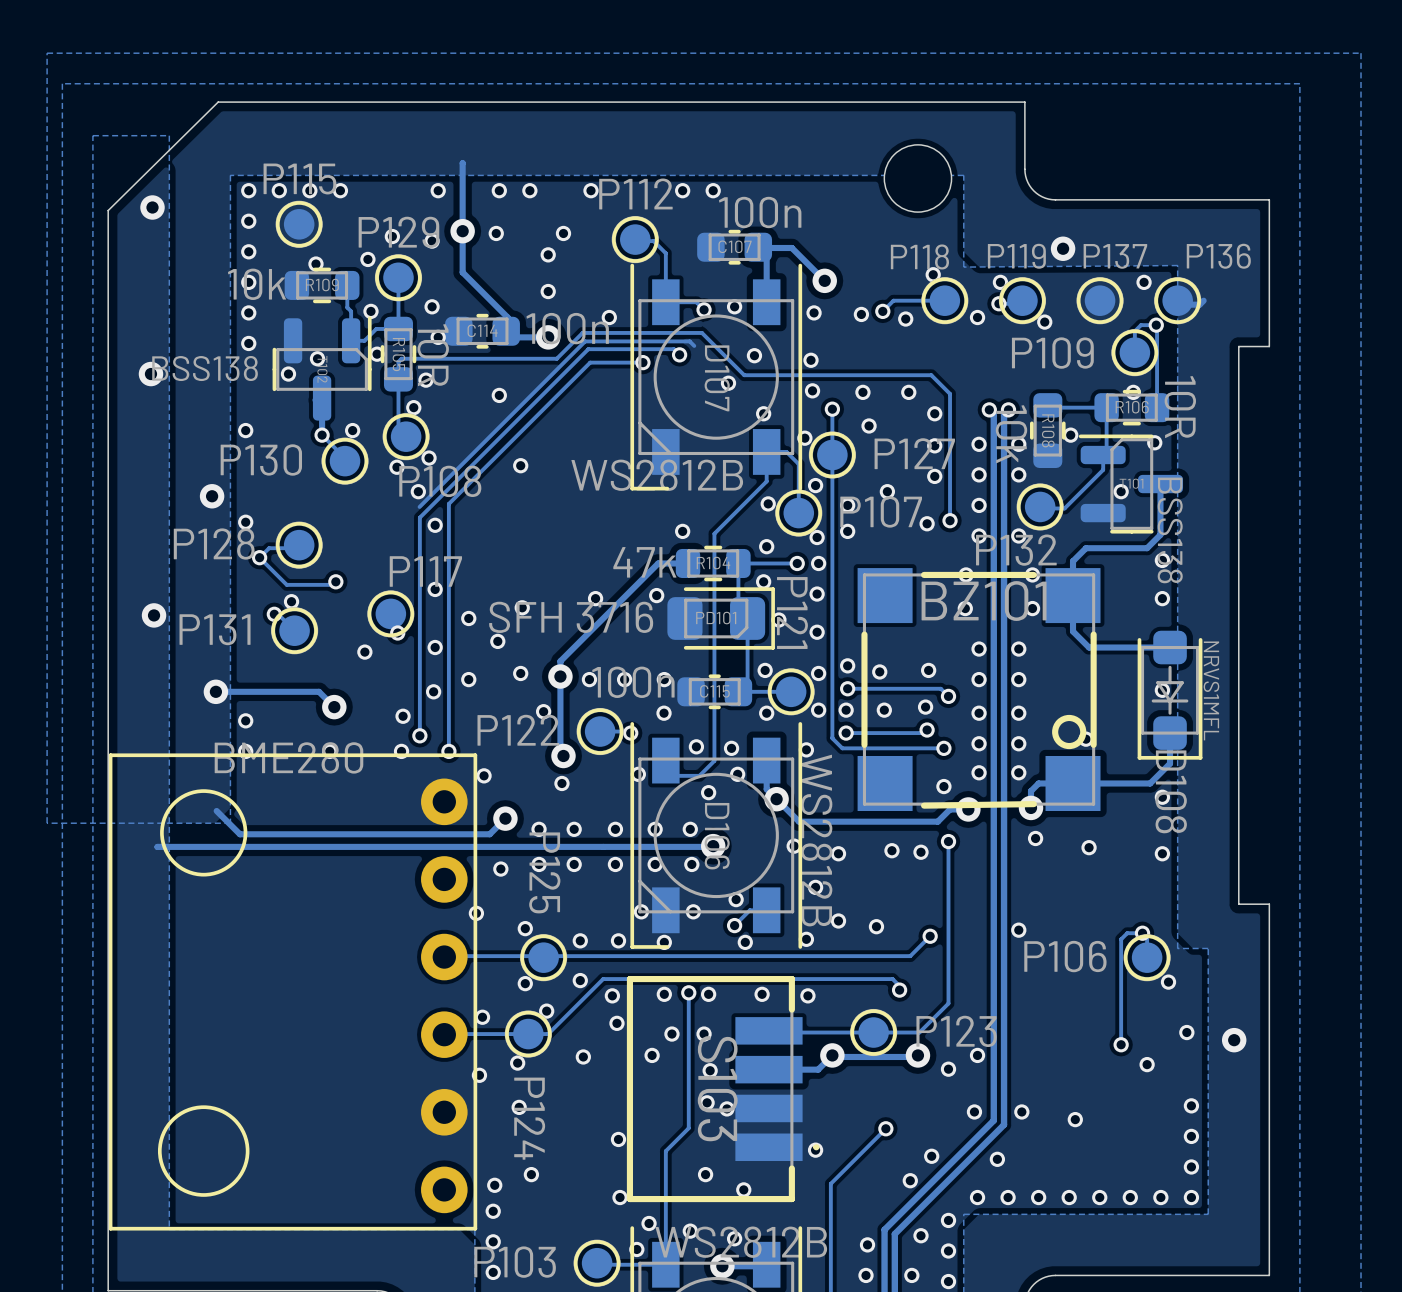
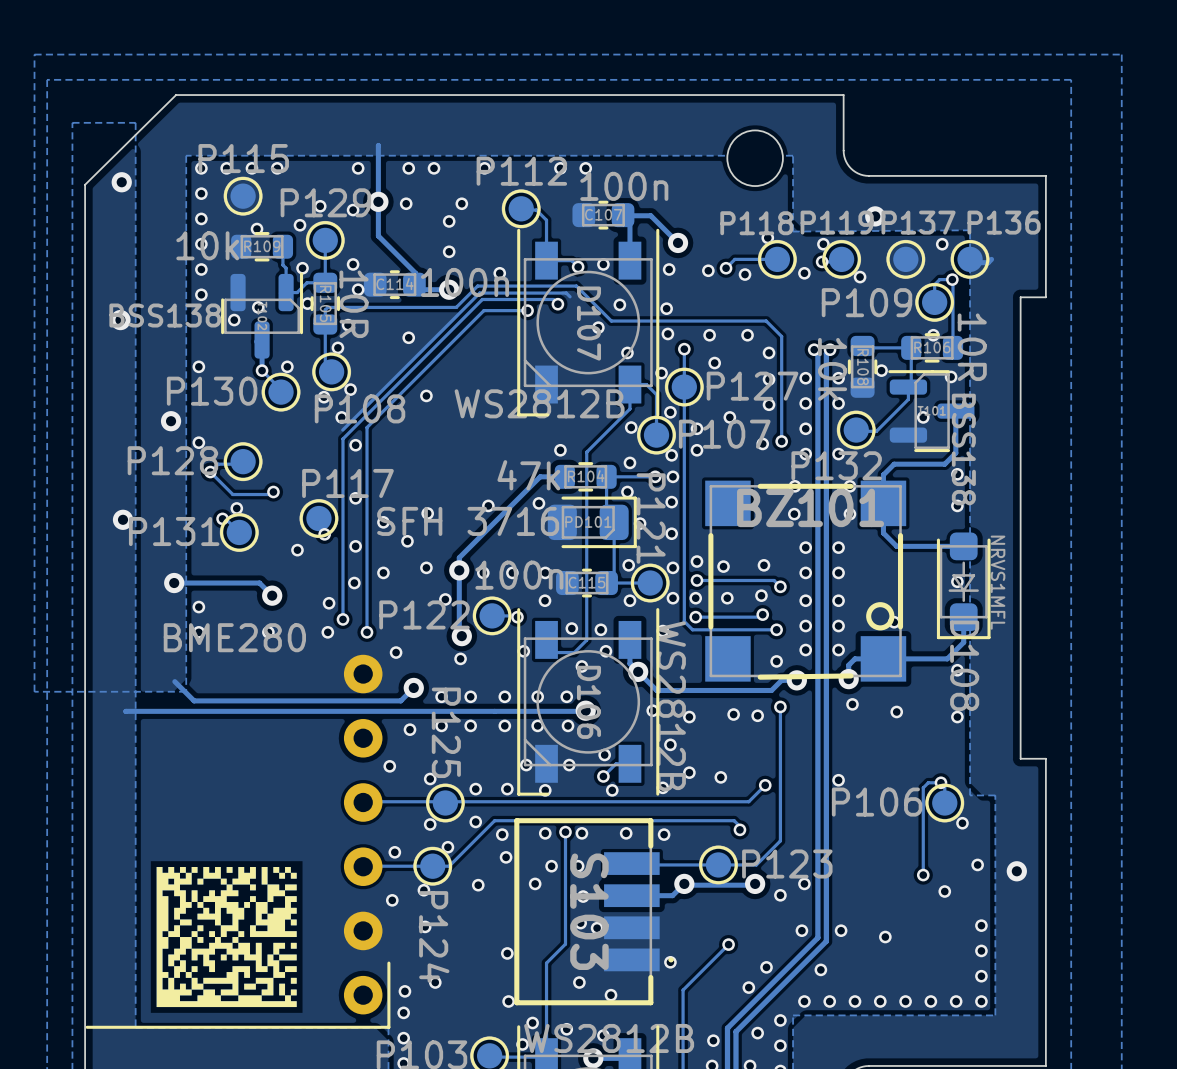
part footprint: [108, 753, 478, 1231] -> [85, 654, 391, 1029]
drawing: none -> [156, 866, 297, 1008]

